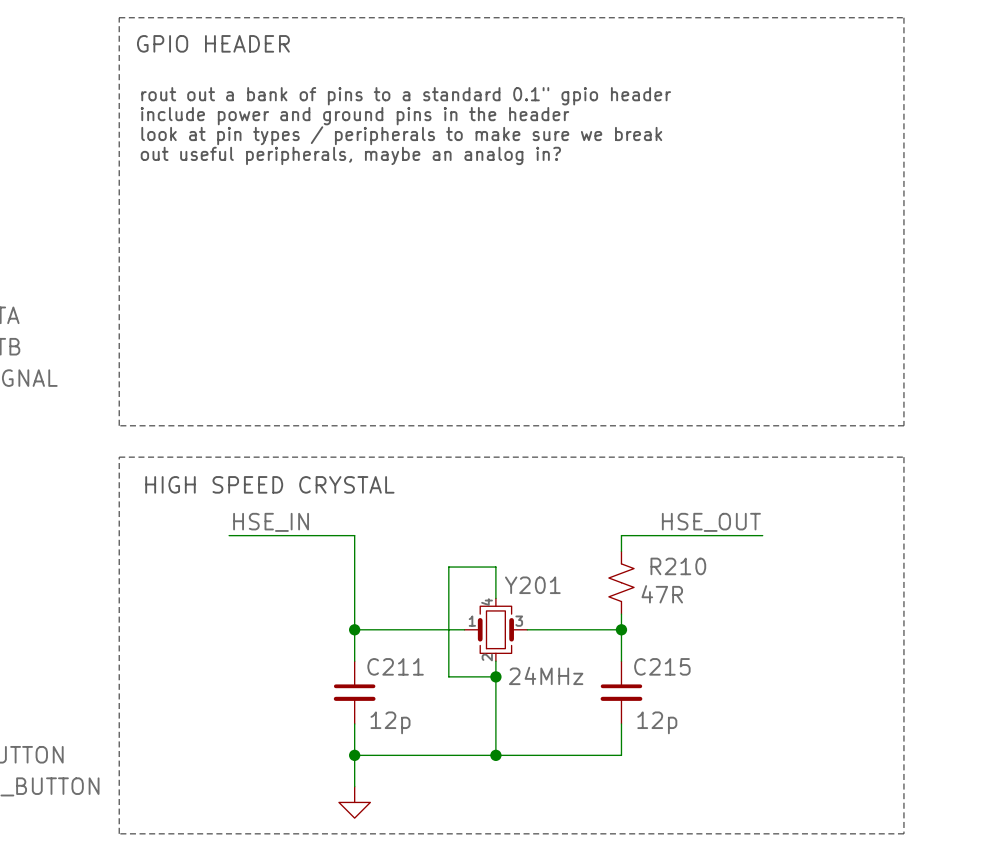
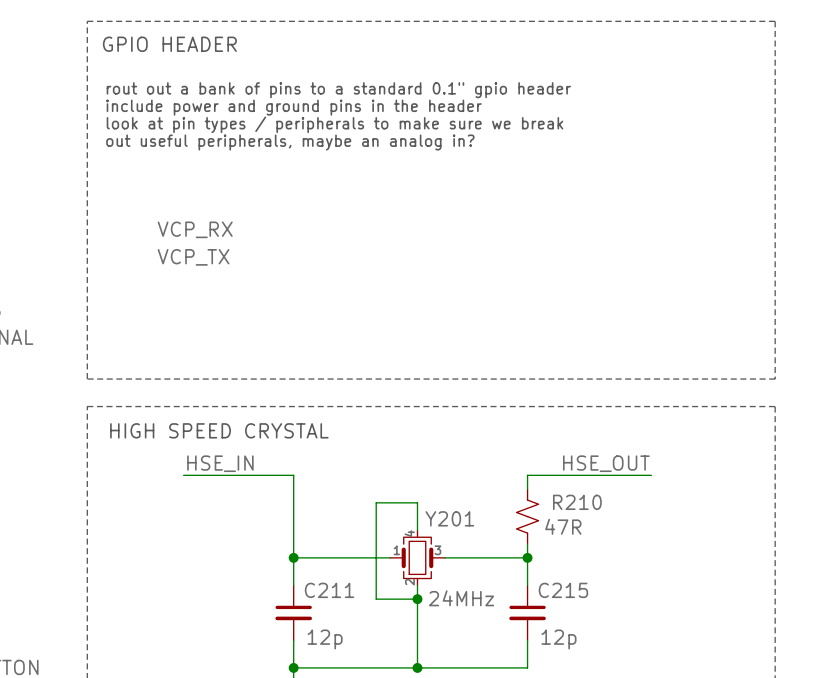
label: none -> VCP_RX (195, 229)
label: none -> VCP_TX (193, 257)

